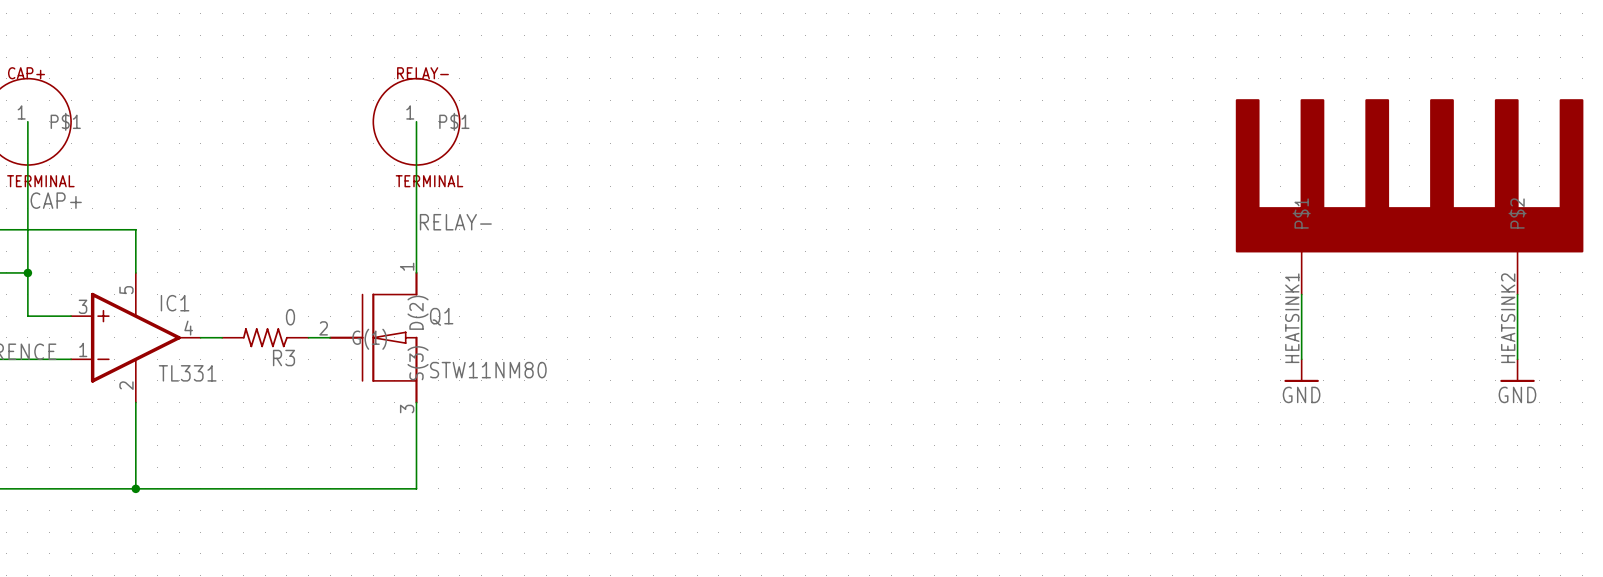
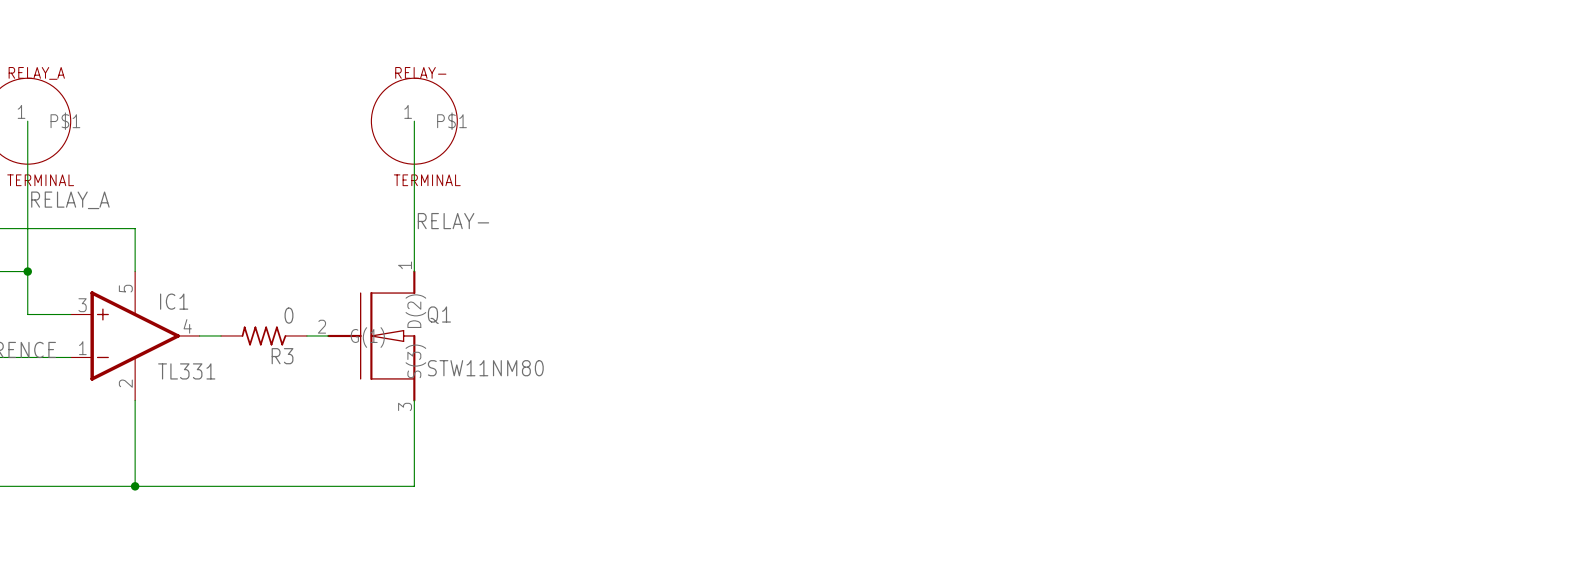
CAP+ name: CAP+ (26, 73) -> RELAY_A (36, 73)
part: (1409, 196) -> none
label: CAP+ (56, 200) -> RELAY_A (70, 200)
wire: (1301, 294) (1301, 359) -> none
wire: (1517, 294) (1517, 359) -> none
power symbol: GND (1301, 370) -> none
power symbol: GND (1517, 370) -> none

